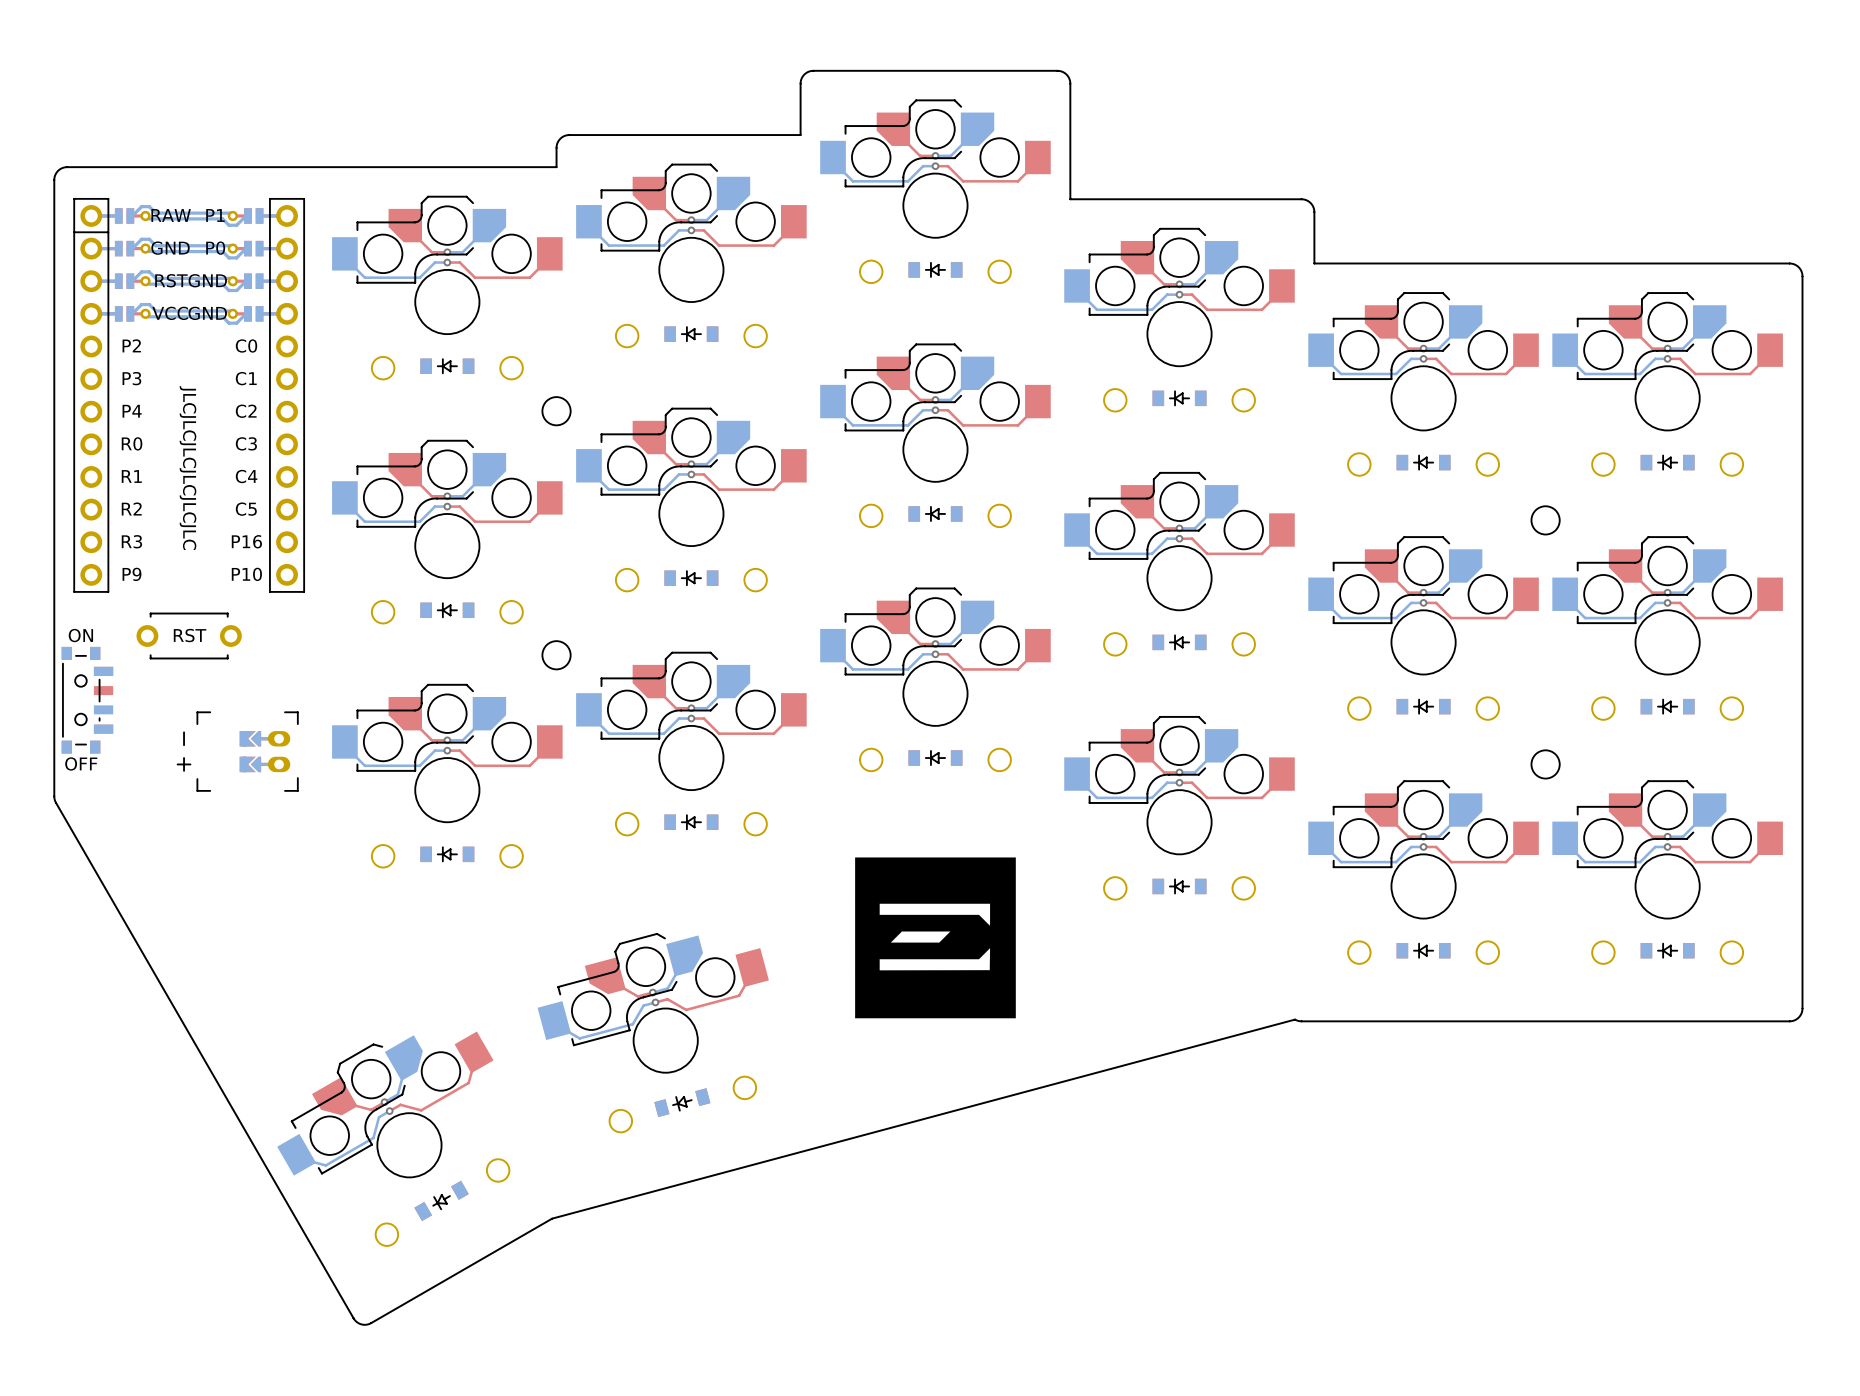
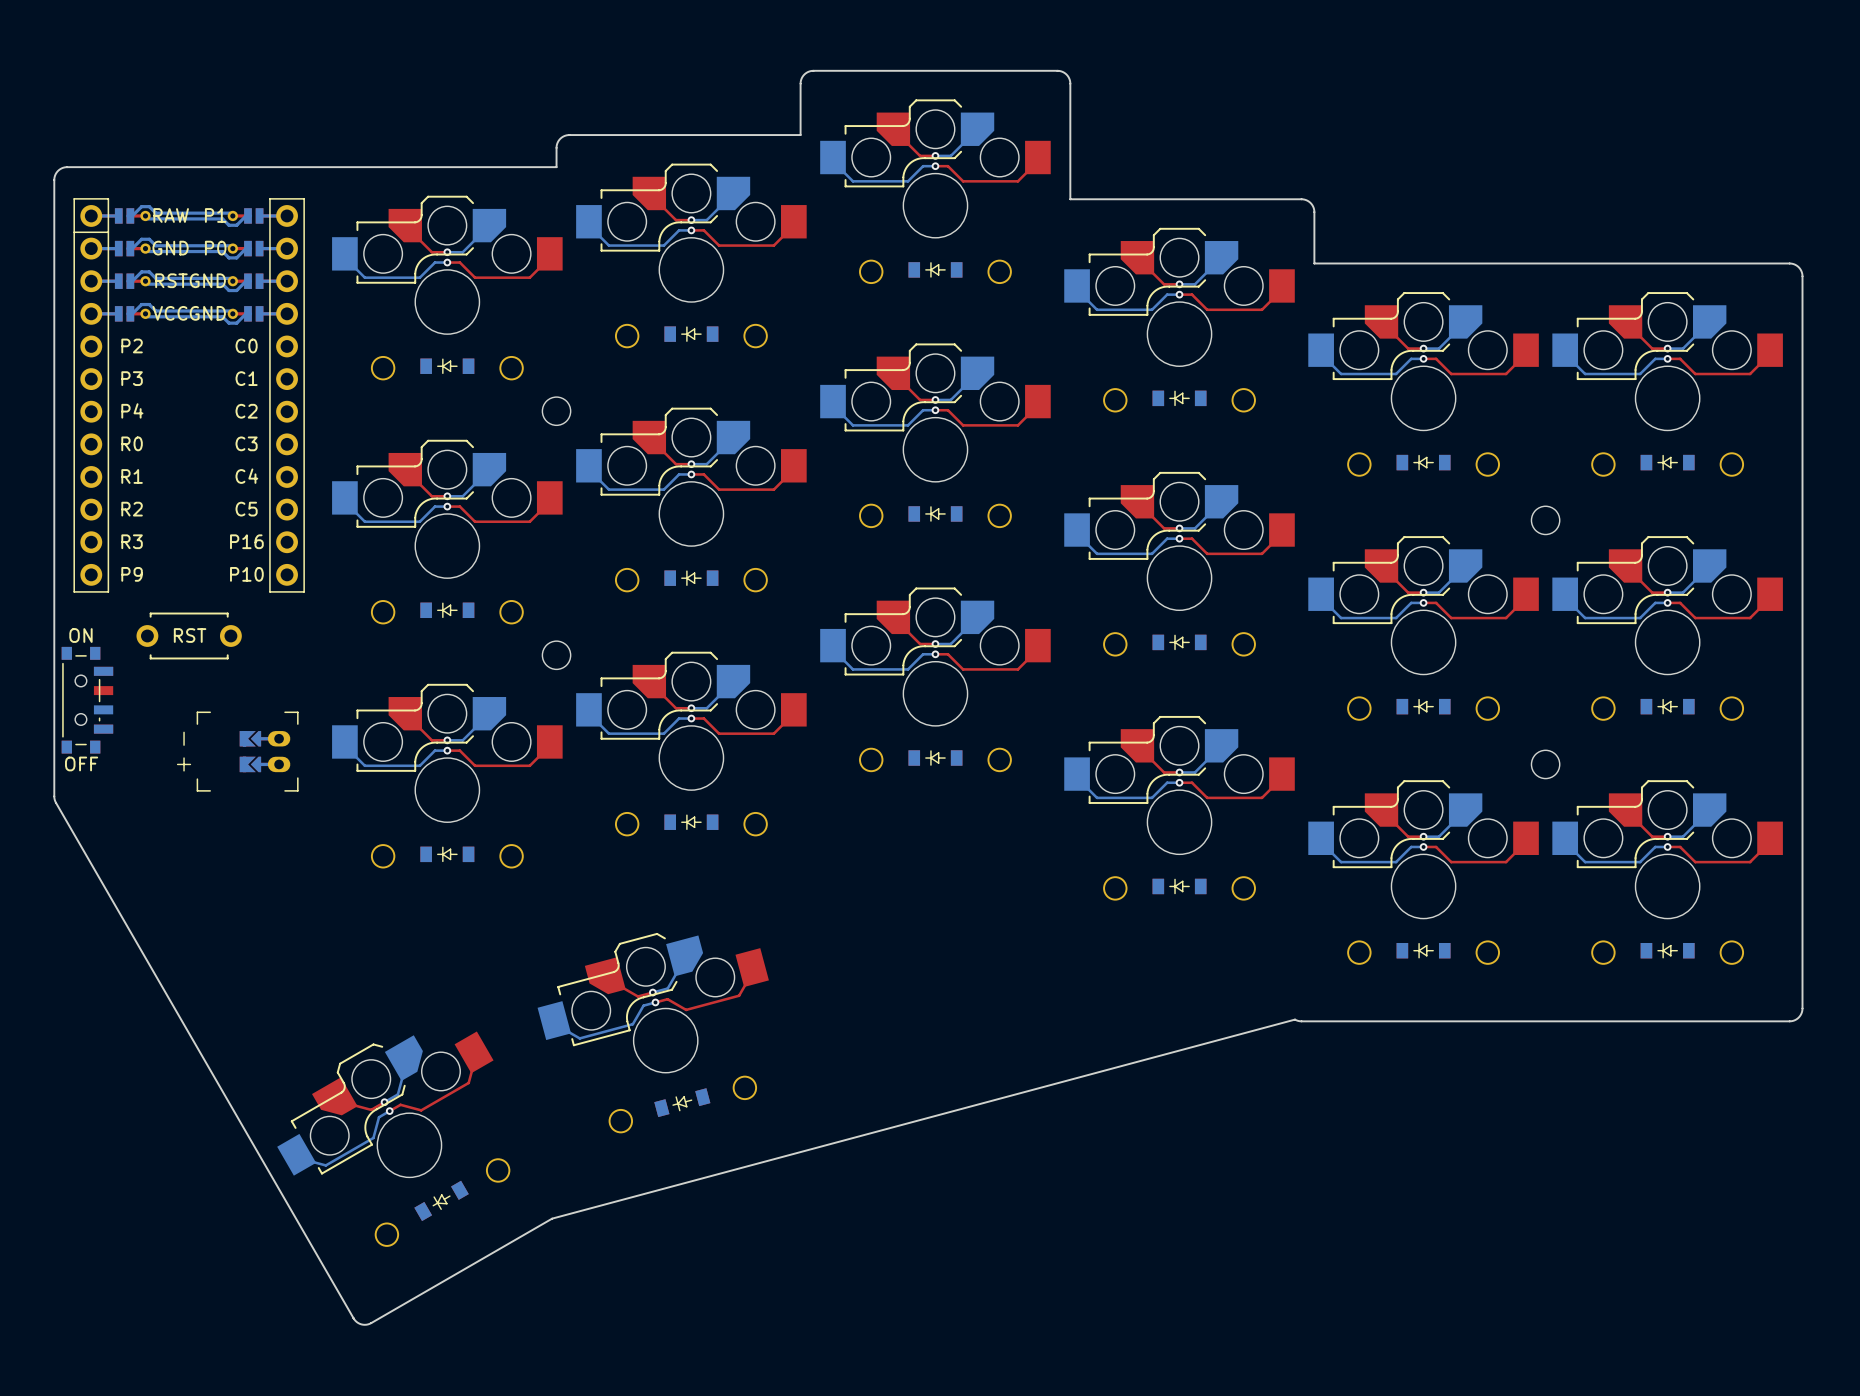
text: JLCJLCJLCJLCJLCJLC (188, 468) -> none
drawing: [855, 857, 1016, 1019] -> none

